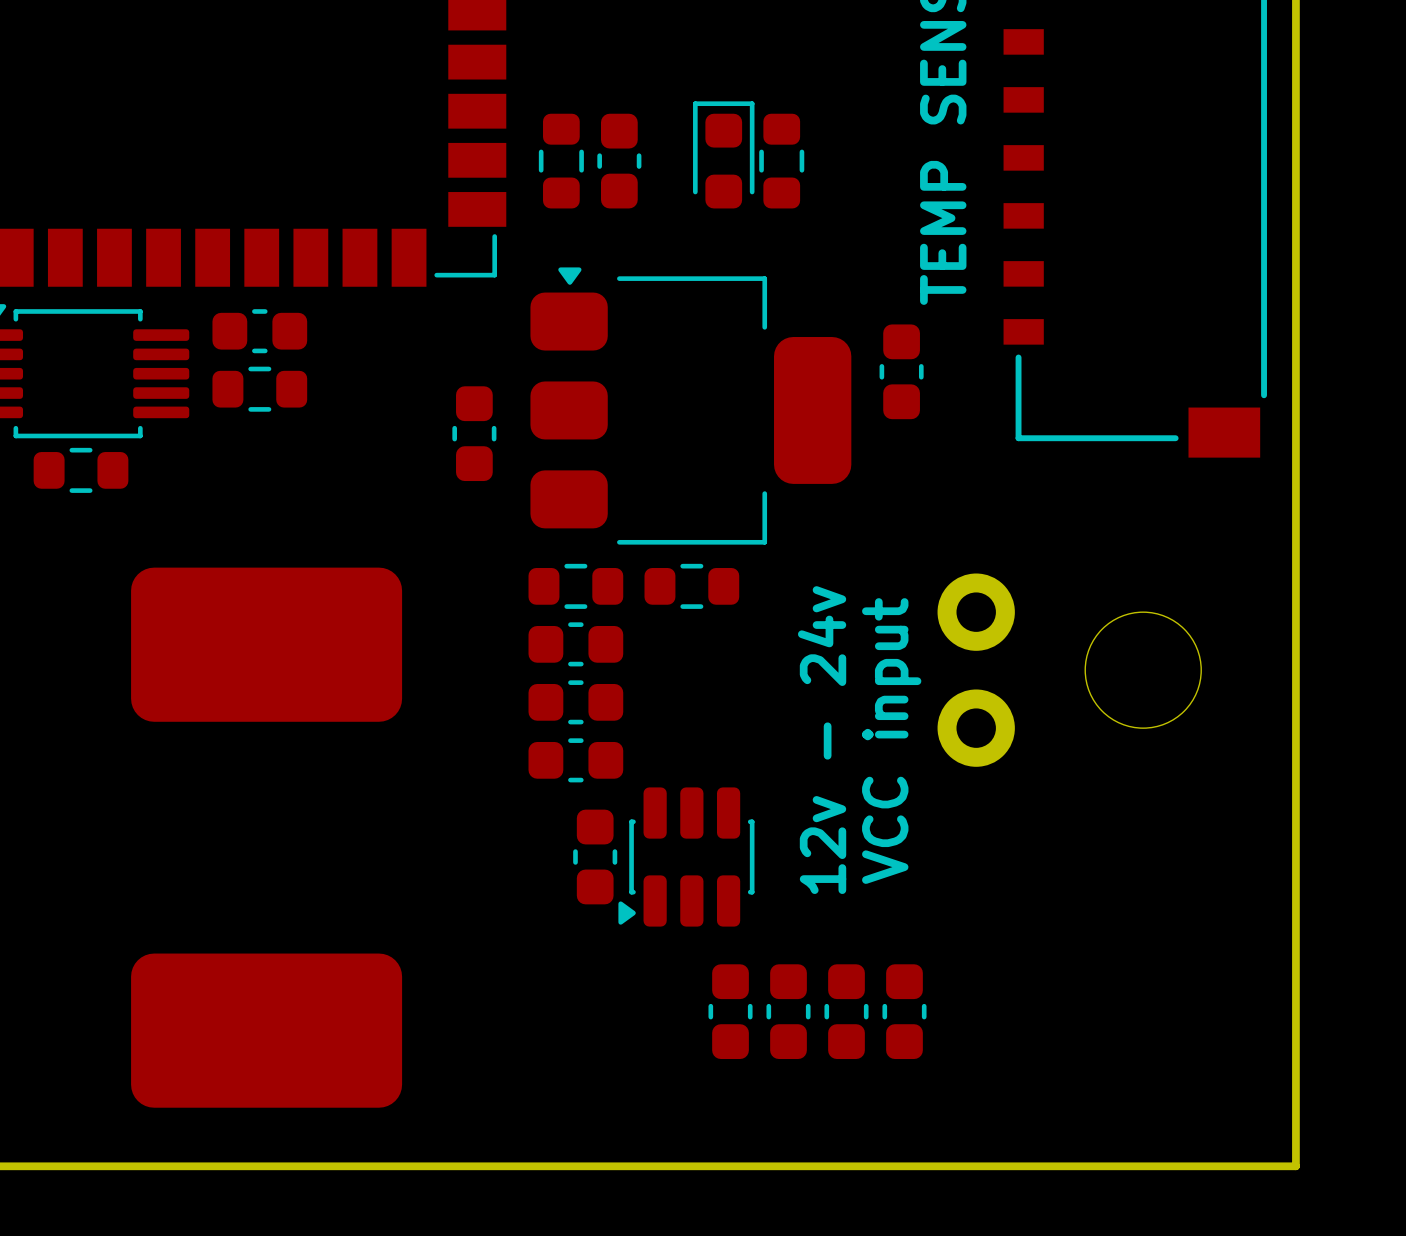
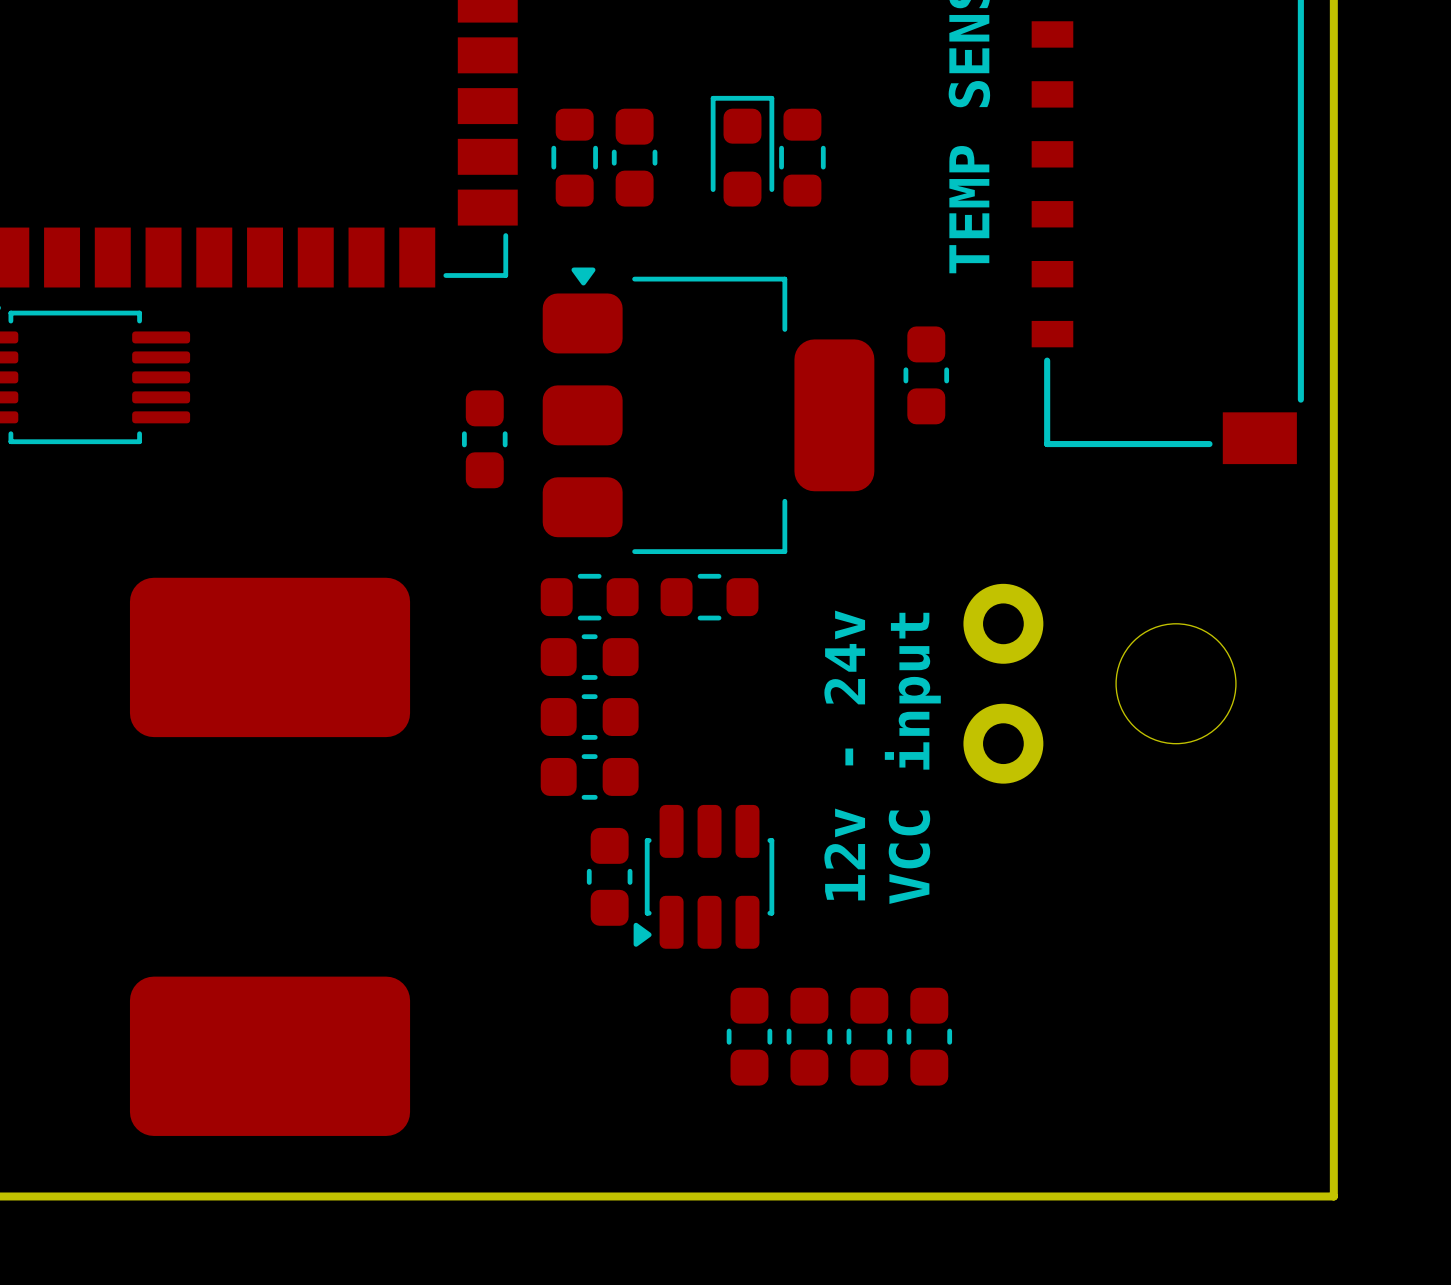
part: (259, 331) -> none
part: (259, 389) -> none
part: (81, 470) -> none

